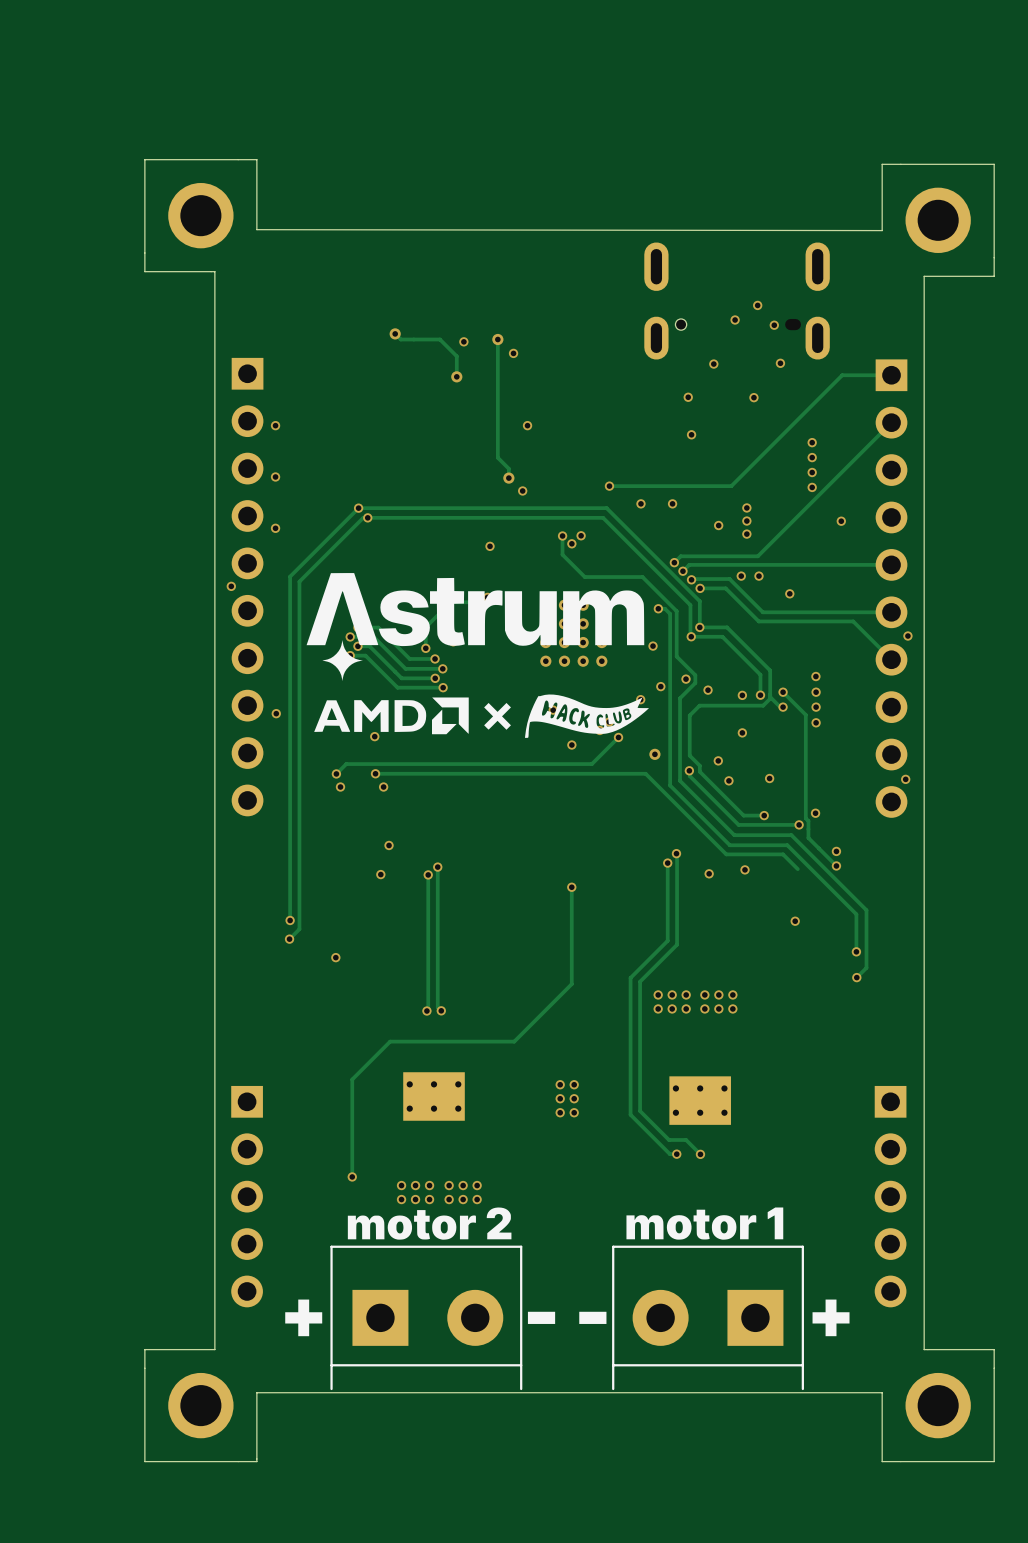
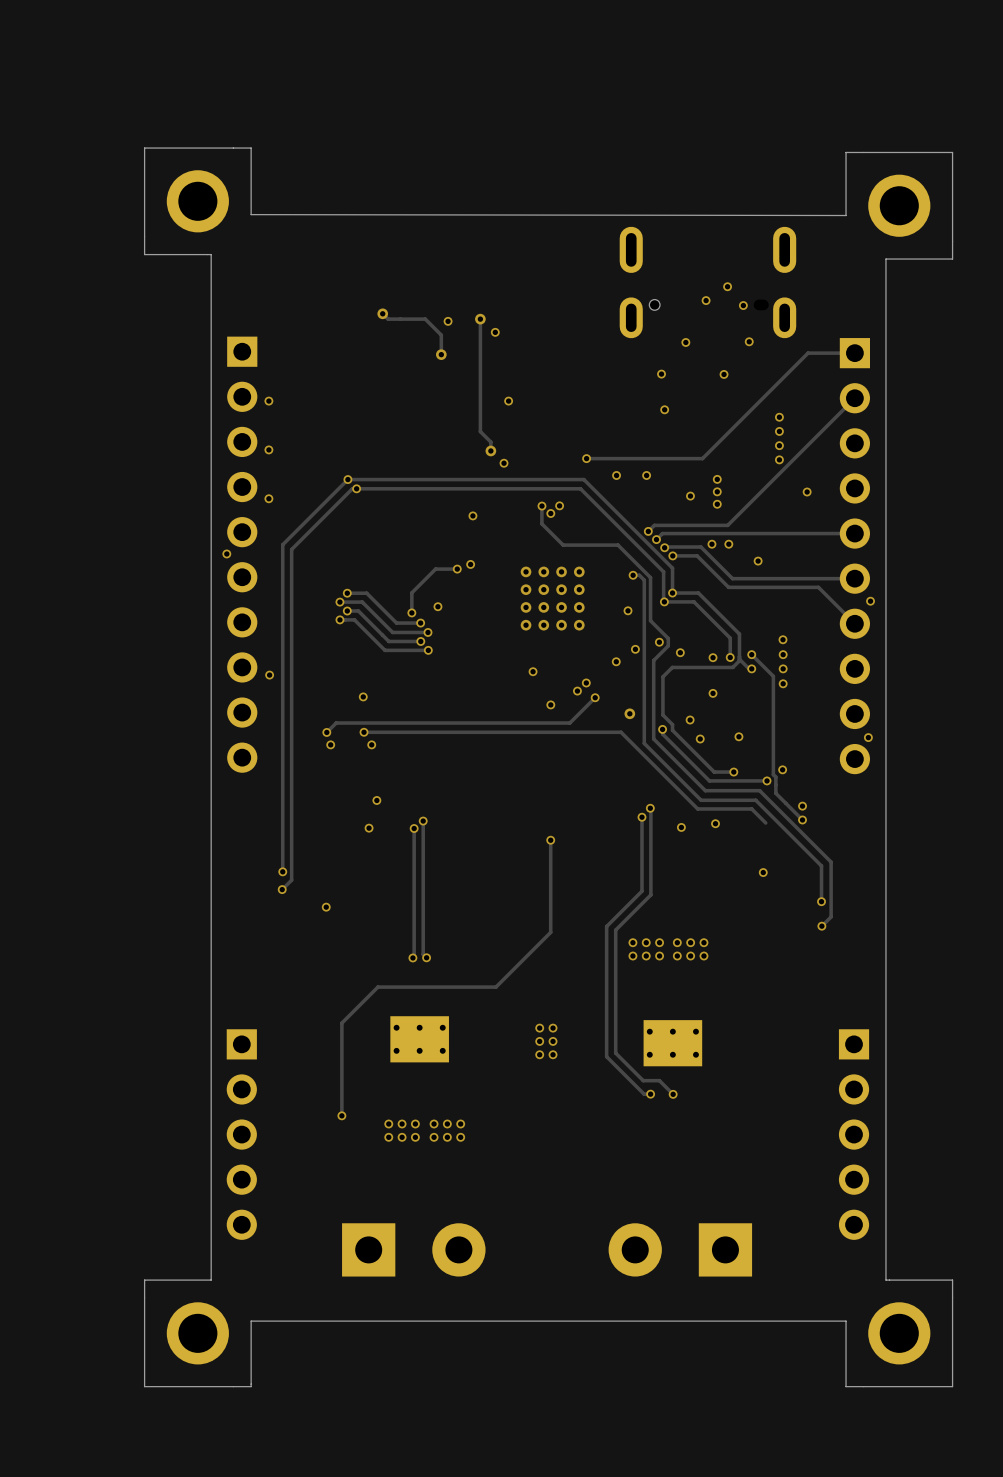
drawing: [306, 573, 650, 738] -> none
drawing: [285, 1207, 556, 1391] -> none
drawing: [579, 1207, 850, 1391] -> none

